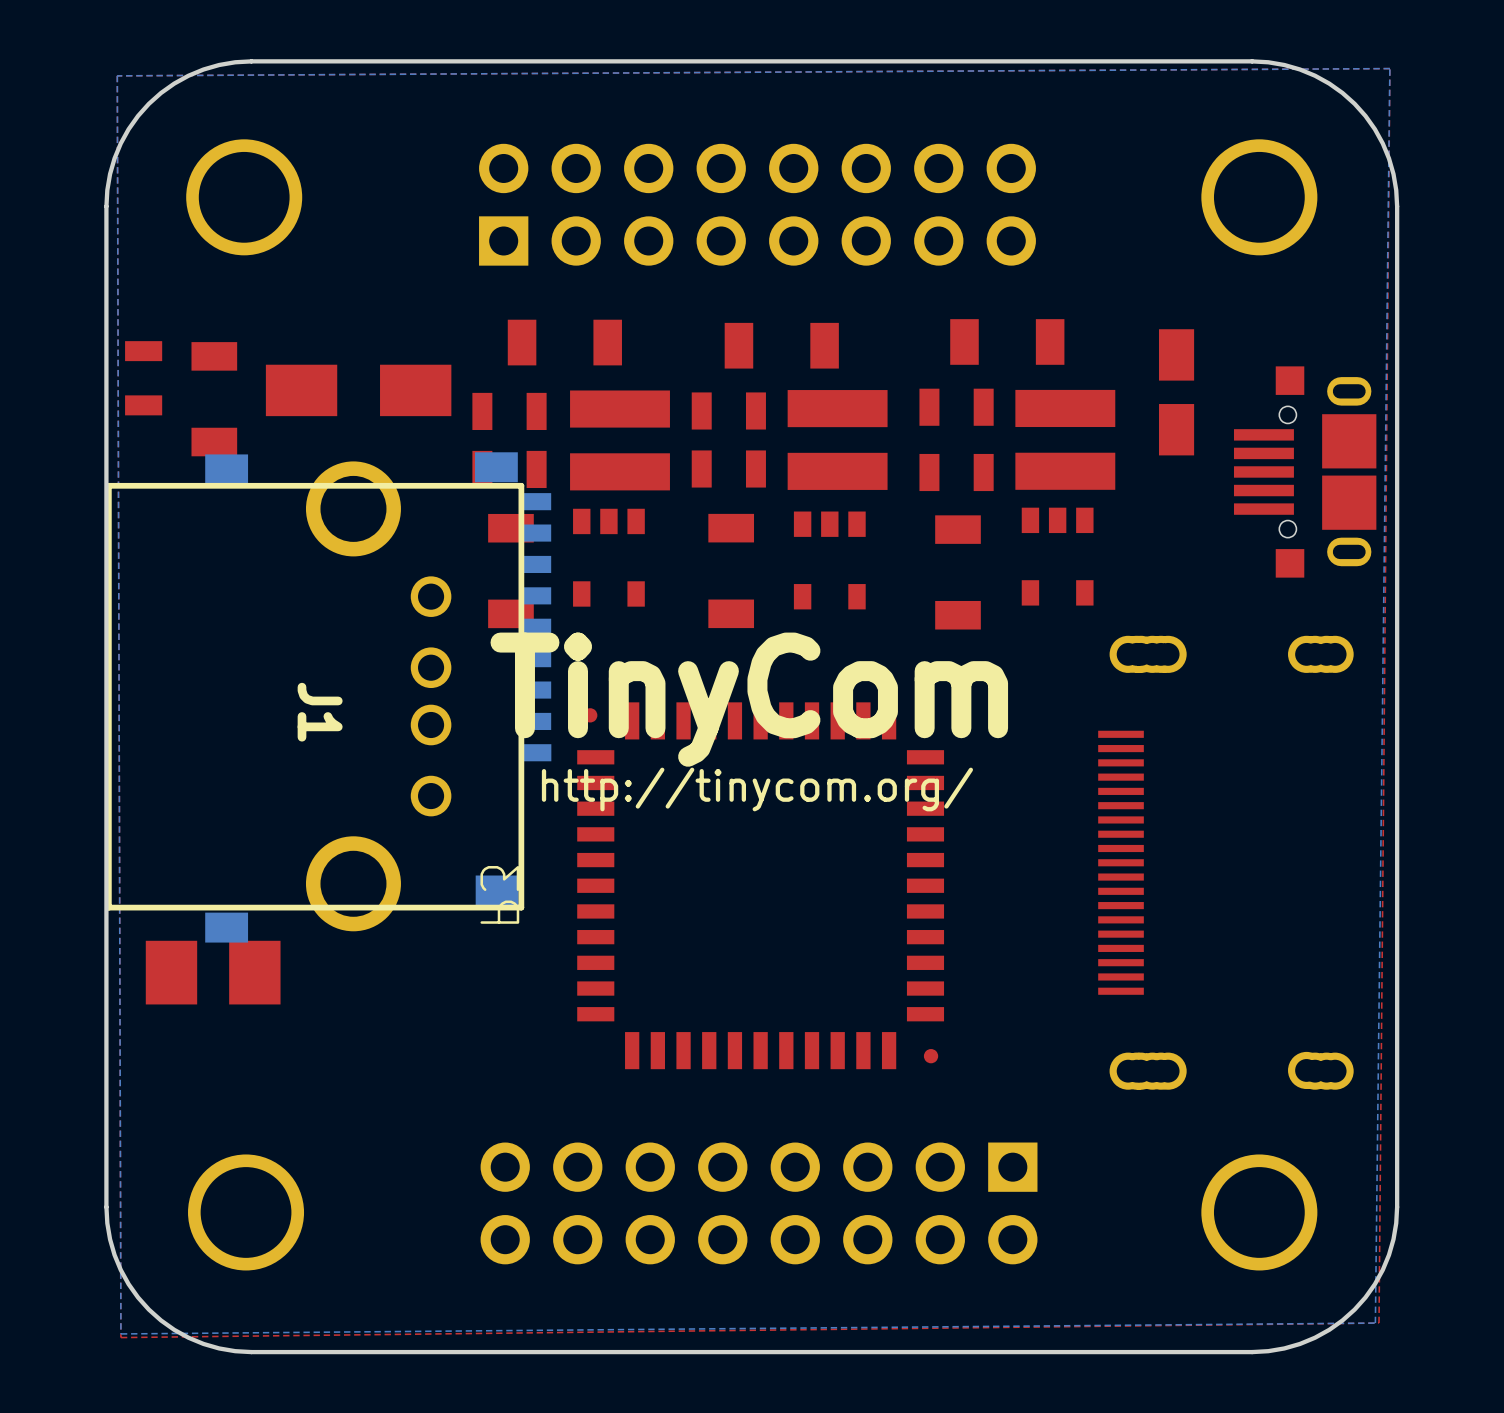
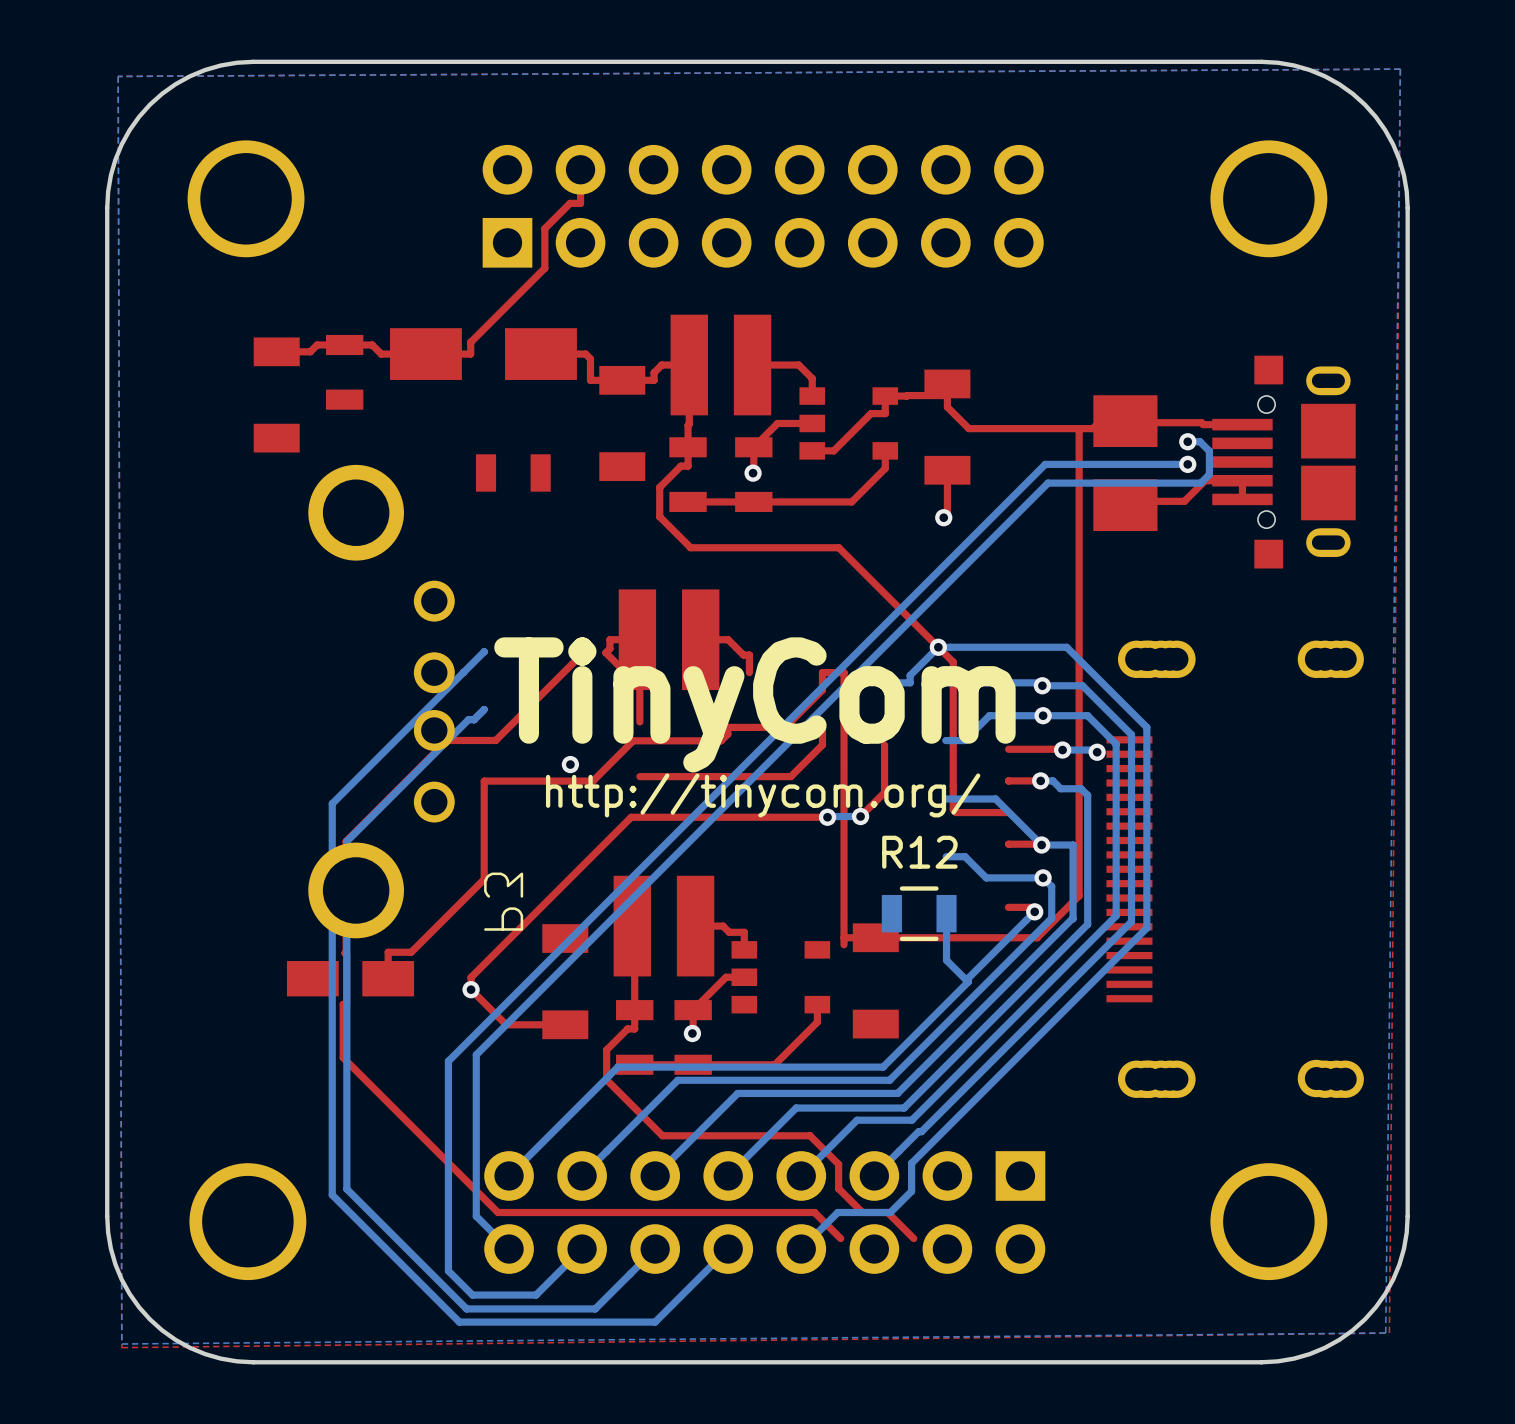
top track: none -> (580, 169) (580, 203) (570, 203) (544, 228) (544, 268) (470, 342) (470, 354) (381, 354) (372, 345) (317, 345) (310, 351) (276, 351)
part: (1007, 341) -> none
part: (564, 342) -> none
part: (781, 345) -> none
part: none -> (483, 354)
top track: none -> (540, 354) (585, 354) (590, 358) (590, 380) (654, 380) (654, 372) (661, 365) (689, 365) (688, 466) (680, 466) (659, 487) (659, 516) (690, 547) (838, 547) (953, 662) (953, 809) (956, 812) (1008, 812)
part: none -> (720, 365)
top track: none -> (752, 365) (798, 365) (812, 378) (812, 396)
part footprint: [265, 364, 452, 417] -> [325, 334, 364, 410]
part: (143, 378) -> none
top track: none -> (947, 383) (947, 407) (968, 428) (1092, 428) (1095, 425) (1148, 425) (1151, 422) (1242, 424)
part footprint: [919, 388, 994, 426] -> [924, 369, 971, 485]
part footprint: [570, 390, 670, 491] -> [599, 365, 646, 481]
part footprint: [787, 390, 888, 490] -> [799, 387, 899, 460]
top track: none -> (947, 395) (885, 396) (885, 413) (871, 413) (833, 450) (812, 450)
part: (1176, 392) -> none
part position: (214, 399) -> (276, 394)
part rotation: 0° (728, 410) -> 90° clockwise (688, 474)
part position: (728, 410) -> (688, 474)
part: (509, 411) -> none
top track: none -> (812, 423) (777, 423) (753, 447) (753, 473)
top track: none -> (1079, 428) (1079, 895) (1037, 937) (844, 937)
bottom track: none -> (1187, 441) (1199, 441) (1209, 451) (1209, 474) (1200, 483) (1048, 483) (476, 1054) (476, 1216) (509, 1249)
via: none -> (1187, 441)
part: (1065, 439) -> none
top track: none -> (885, 450) (885, 468) (851, 501) (688, 501)
part: none -> (1125, 463)
bottom track: none -> (1187, 464) (1045, 464) (448, 1061) (448, 1270) (472, 1295) (536, 1295) (582, 1249)
via: none -> (1187, 464)
top track: none -> (947, 470) (947, 514) (943, 517)
part rotation: 0° (728, 468) -> 90° clockwise (753, 474)
via: none -> (753, 473)
part: (956, 472) -> none
part position: (1305, 472) -> (1284, 462)
top track: none -> (1242, 499) (1242, 480) (1205, 480) (1184, 501) (1122, 501)
via: none -> (943, 517)
part: (1057, 556) -> none
part: (608, 557) -> none
part: (829, 560) -> none
part: (731, 570) -> none
part: (510, 571) -> none
part: (958, 572) -> none
top track: none -> (637, 639) (609, 639) (609, 648) (605, 652) (639, 686) (639, 721)
part: none -> (669, 639)
top track: none -> (700, 639) (728, 639) (743, 655) (749, 655) (749, 672)
via: none -> (938, 647)
bottom track: none -> (484, 651) (332, 803) (332, 1194) (459, 1322) (655, 1322) (728, 1249)
top track: none -> (580, 652) (580, 655) (495, 740) (447, 740) (346, 841) (346, 1002) (343, 1004) (343, 1057) (497, 1212) (814, 1212) (840, 1238)
bottom track: none -> (945, 682) (1039, 682) (1042, 685) (1082, 685) (1131, 734) (1131, 921) (921, 1131) (918, 1131) (874, 1175)
via: none -> (1042, 685)
J1: (328, 697) -> none
bottom track: none -> (484, 709) (474, 719) (468, 719) (346, 841) (346, 1189) (466, 1308) (595, 1308) (655, 1249)
bottom track: none -> (891, 710) (891, 682) (910, 682) (910, 675) (938, 647) (1066, 647) (1146, 727) (1146, 928) (911, 1163) (911, 1191) (890, 1212) (837, 1212) (801, 1249)
via: none -> (1043, 715)
top track: none -> (822, 727) (822, 744) (790, 776) (639, 776)
bottom track: none -> (945, 740) (964, 740) (989, 715) (1087, 715) (1116, 744) (1116, 915) (911, 1120) (857, 1120) (801, 1175)
top track: none -> (884, 744) (884, 792) (860, 816)
top track: none -> (1008, 749) (1062, 750)
bottom track: none -> (1062, 750) (1094, 750) (1097, 752)
via: none -> (1062, 750)
via: none -> (1097, 752)
via: none -> (570, 764)
top track: none -> (1040, 780) (1008, 780)
bottom track: none -> (1040, 780) (1052, 780) (1060, 788) (1081, 788) (1087, 795) (1087, 924) (904, 1108) (796, 1108) (728, 1175)
via: none -> (1040, 780)
bottom track: none -> (946, 799) (995, 799) (1041, 845) (1073, 845) (1073, 918) (897, 1093) (737, 1093) (655, 1175)
bottom track: none -> (860, 816) (827, 817)
via: none -> (860, 816)
top track: none -> (827, 817) (631, 817) (471, 977) (471, 989) (506, 1024) (565, 1024)
via: none -> (827, 817)
top track: none -> (1008, 844) (1041, 845)
via: none -> (1041, 845)
bottom track: none -> (946, 856) (965, 856) (986, 877) (1043, 877) (1051, 886) (1051, 918) (889, 1080) (677, 1080) (582, 1175)
via: none -> (1043, 877)
part: (760, 885) -> none
top track: none -> (1008, 907) (1030, 907) (1034, 911)
bottom track: none -> (1034, 911) (968, 978) (968, 982)
via: none -> (1034, 911)
R12: none -> (919, 913)
bottom track: none -> (946, 913) (946, 960) (968, 982)
top track: none -> (625, 926) (634, 935) (634, 1028) (627, 1028) (606, 1049) (606, 1079) (662, 1135) (810, 1135) (838, 1164) (838, 1188) (862, 1212) (887, 1212) (913, 1238)
part: none -> (663, 926)
top track: none -> (695, 926) (723, 926) (729, 932) (744, 932) (744, 949)
top track: none -> (844, 944) (844, 672) (822, 672) (822, 690) (785, 727) (727, 727) (727, 734) (721, 740) (633, 740) (592, 781) (484, 781) (484, 879) (411, 952) (388, 952) (388, 978)
top track: none -> (744, 977) (726, 977) (693, 1010) (692, 1033)
part: none -> (780, 977)
part: none -> (350, 978)
part: (213, 972) -> none
part: none -> (875, 980)
part: none -> (565, 981)
bottom track: none -> (968, 982) (883, 1067) (617, 1067) (509, 1175)
via: none -> (471, 989)
top track: none -> (817, 1004) (817, 1022) (774, 1064) (634, 1064)
via: none -> (692, 1033)
part: none -> (634, 1037)
part: none -> (693, 1037)

